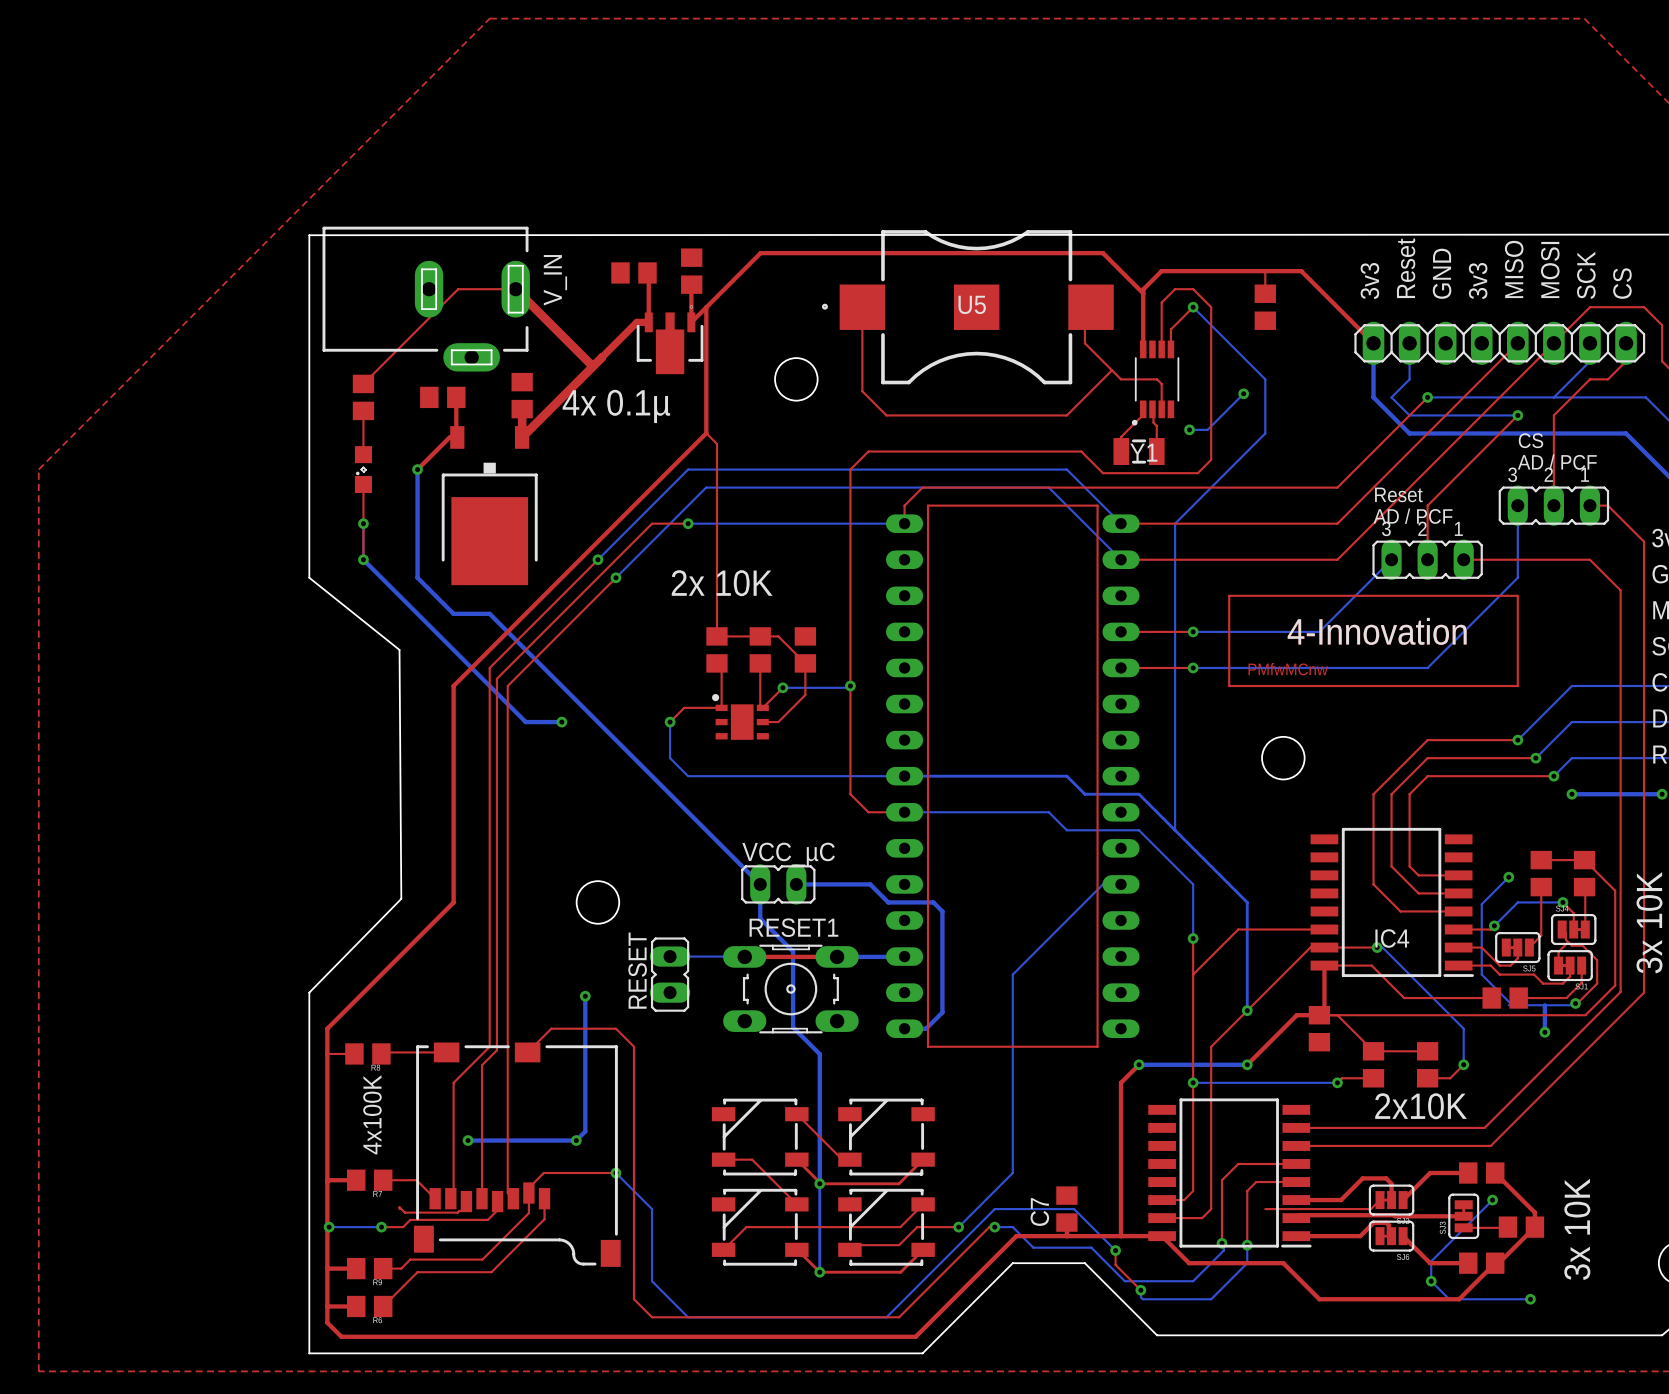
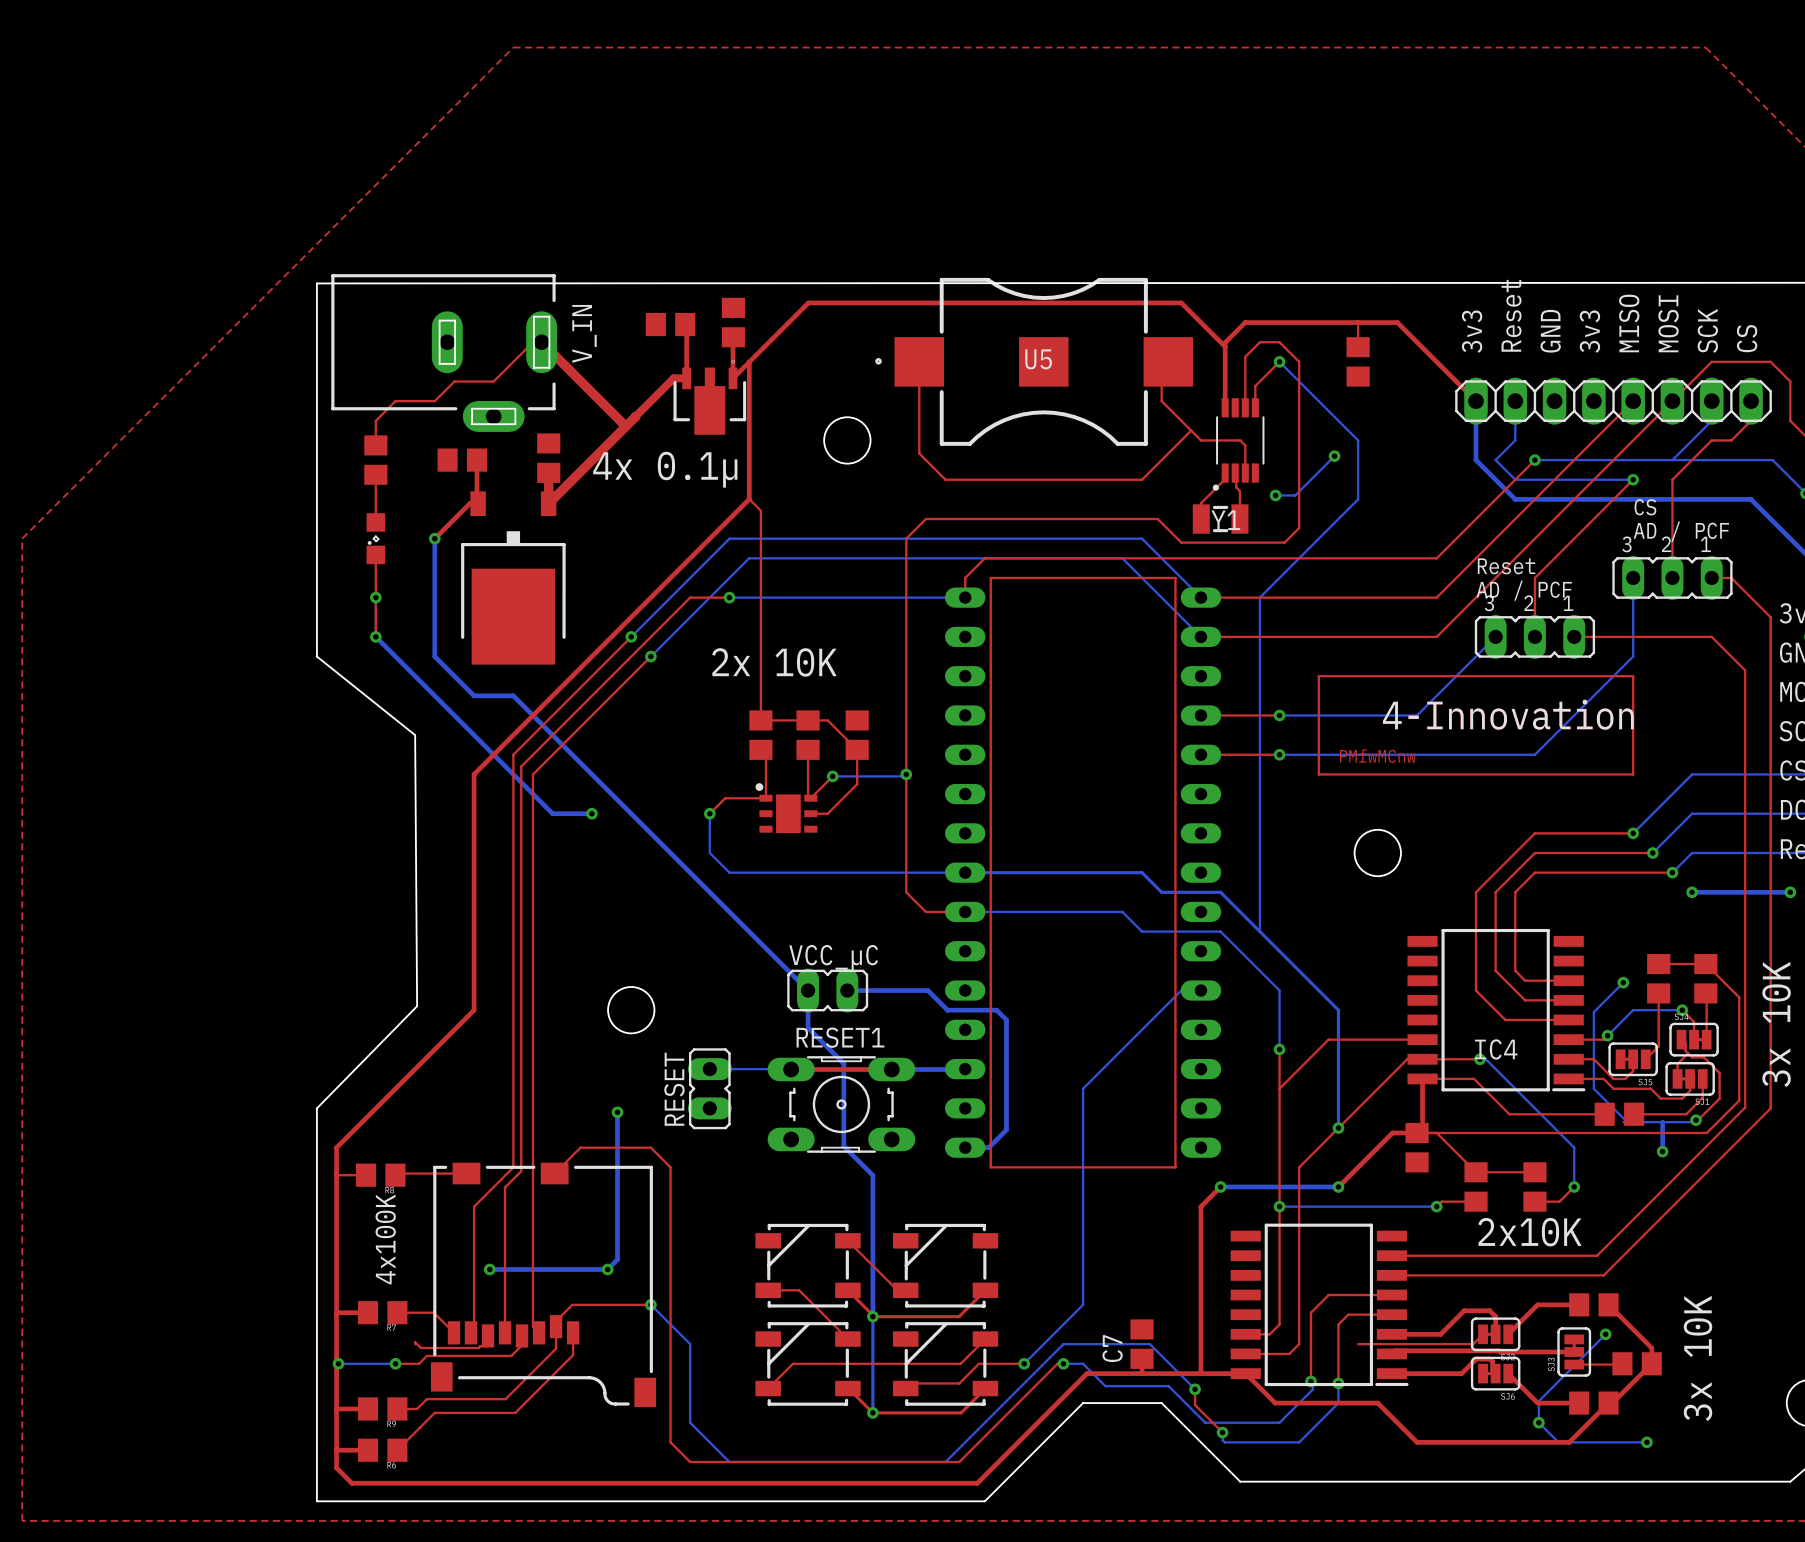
top track: (515, 289) (458, 289) (363, 383) -> (547, 347) (527, 347) (493, 381) (454, 381) (434, 401) (395, 401) (375, 420) (375, 445)

